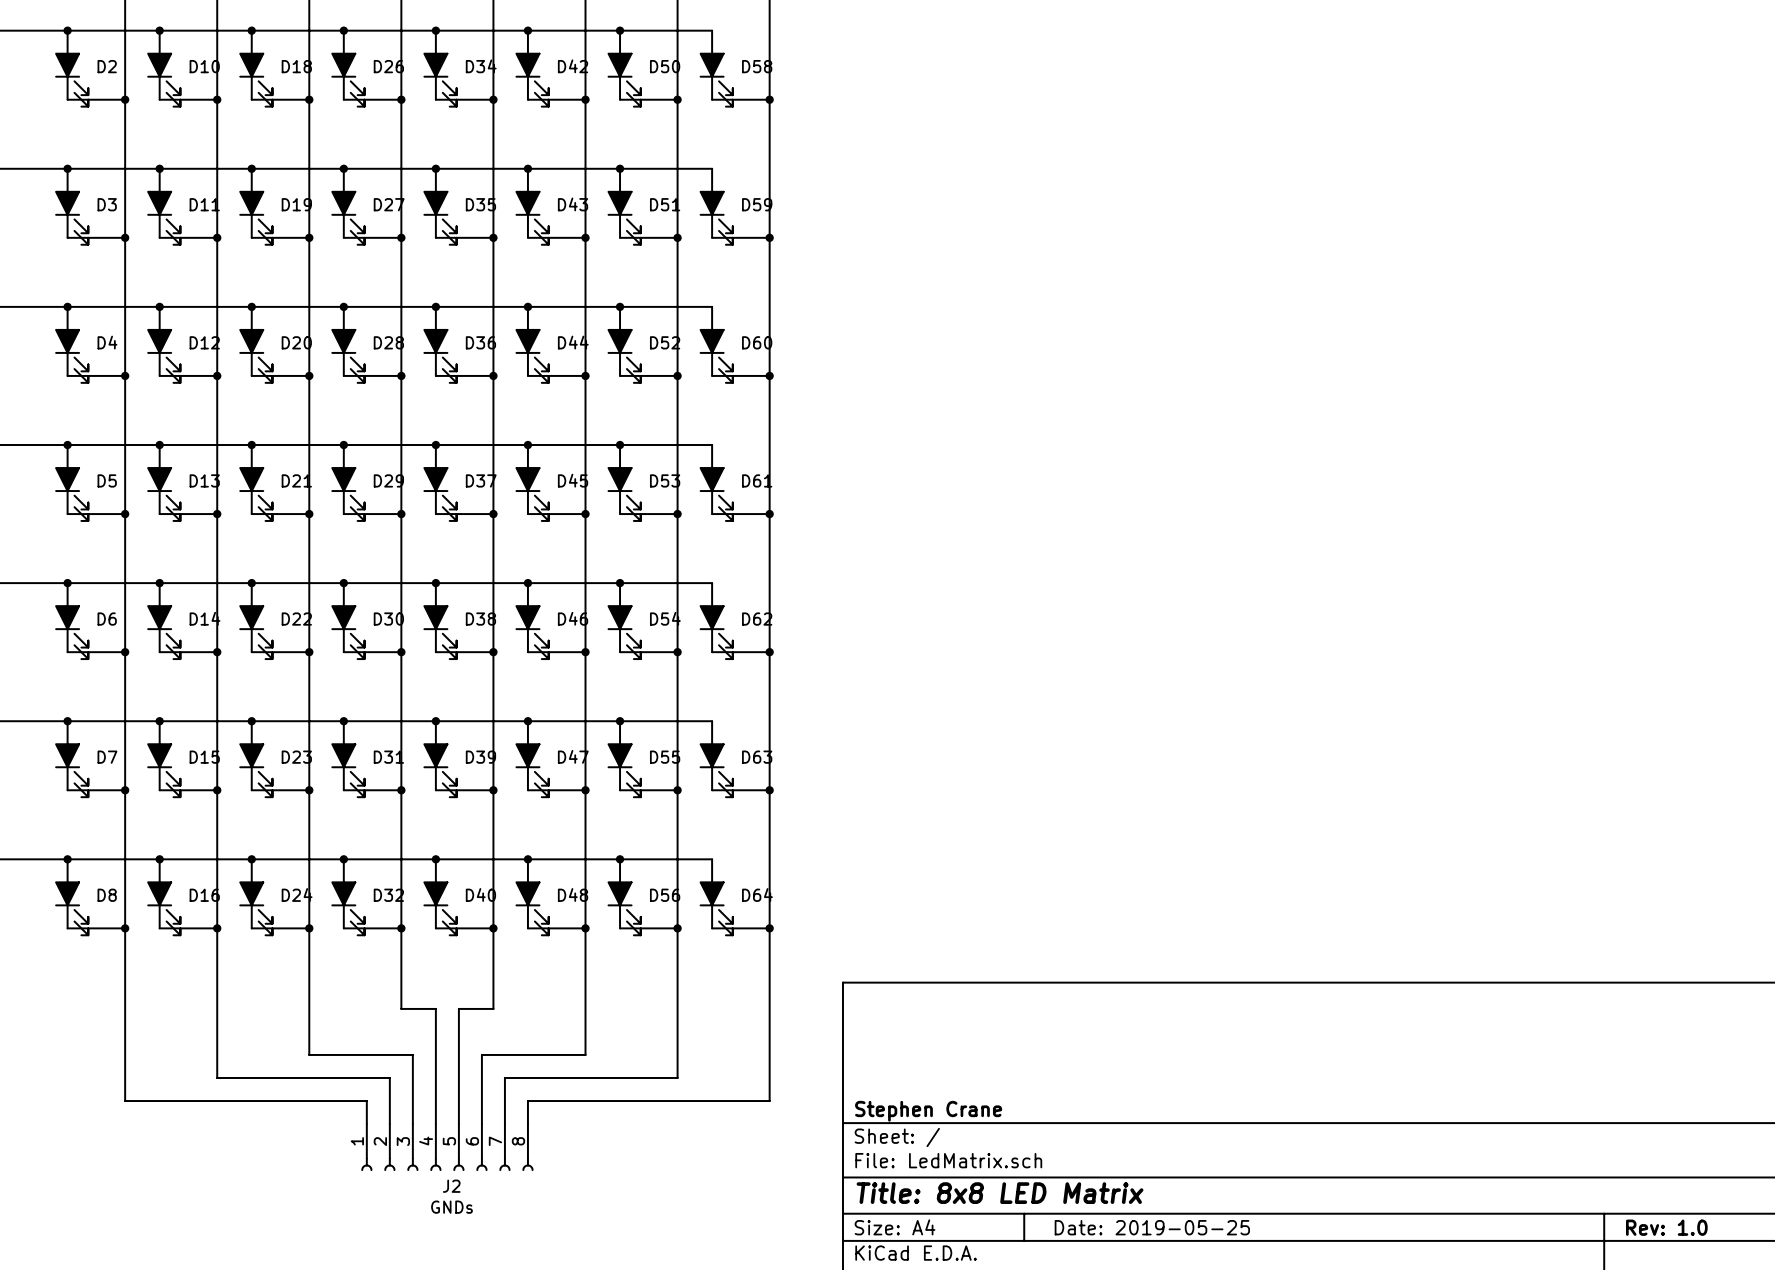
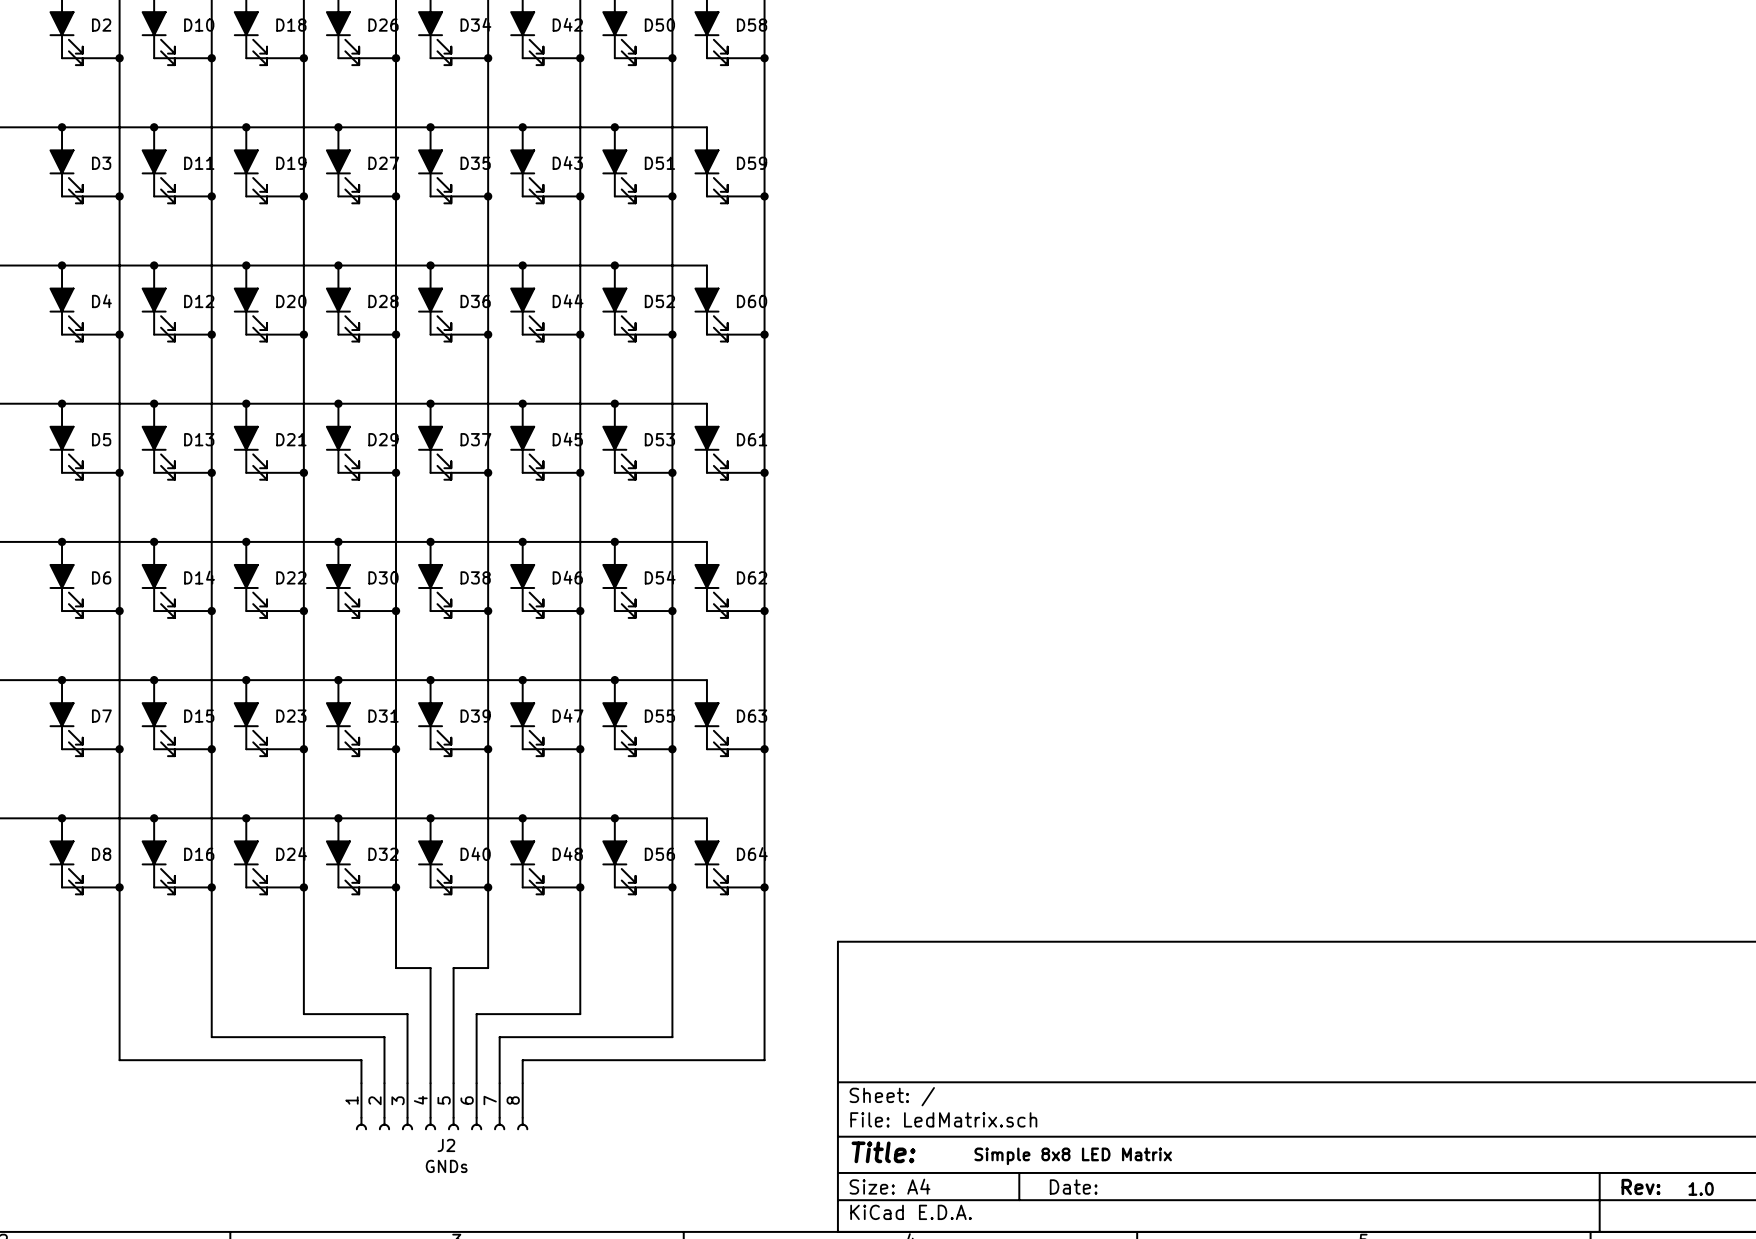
title block: Stephen Crane (928, 1111) -> none
title block: Title: 8x8 LED Matrix (1000, 1193) -> Title: (883, 1152)
text: none -> Simple 8x8 LED Matrix (1073, 1156)
title block: Date: 2019-05-25 (1152, 1227) -> Date: (1073, 1186)
title block: Rev: 1.0 (1666, 1227) -> Rev: (1640, 1186)
text: none -> 1.0 (1701, 1188)

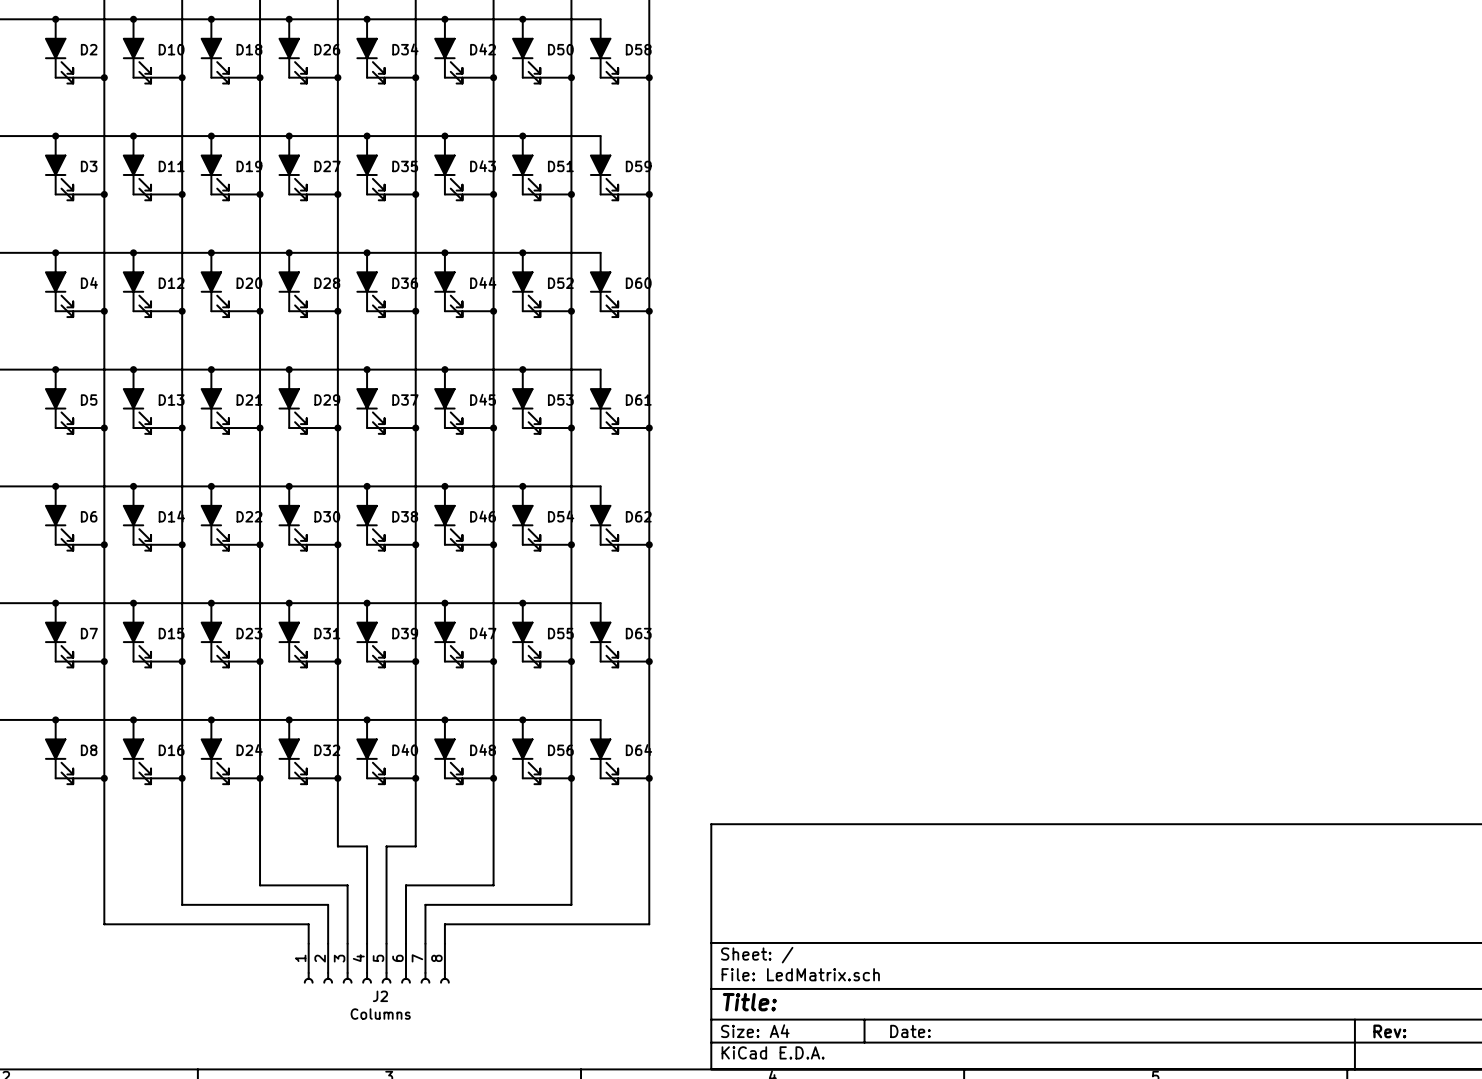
text: Simple 8x8 LED Matrix (1073, 1156) -> none
J2 value: GNDs (446, 1166) -> Columns (380, 1014)
text: 1.0 (1701, 1188) -> none

